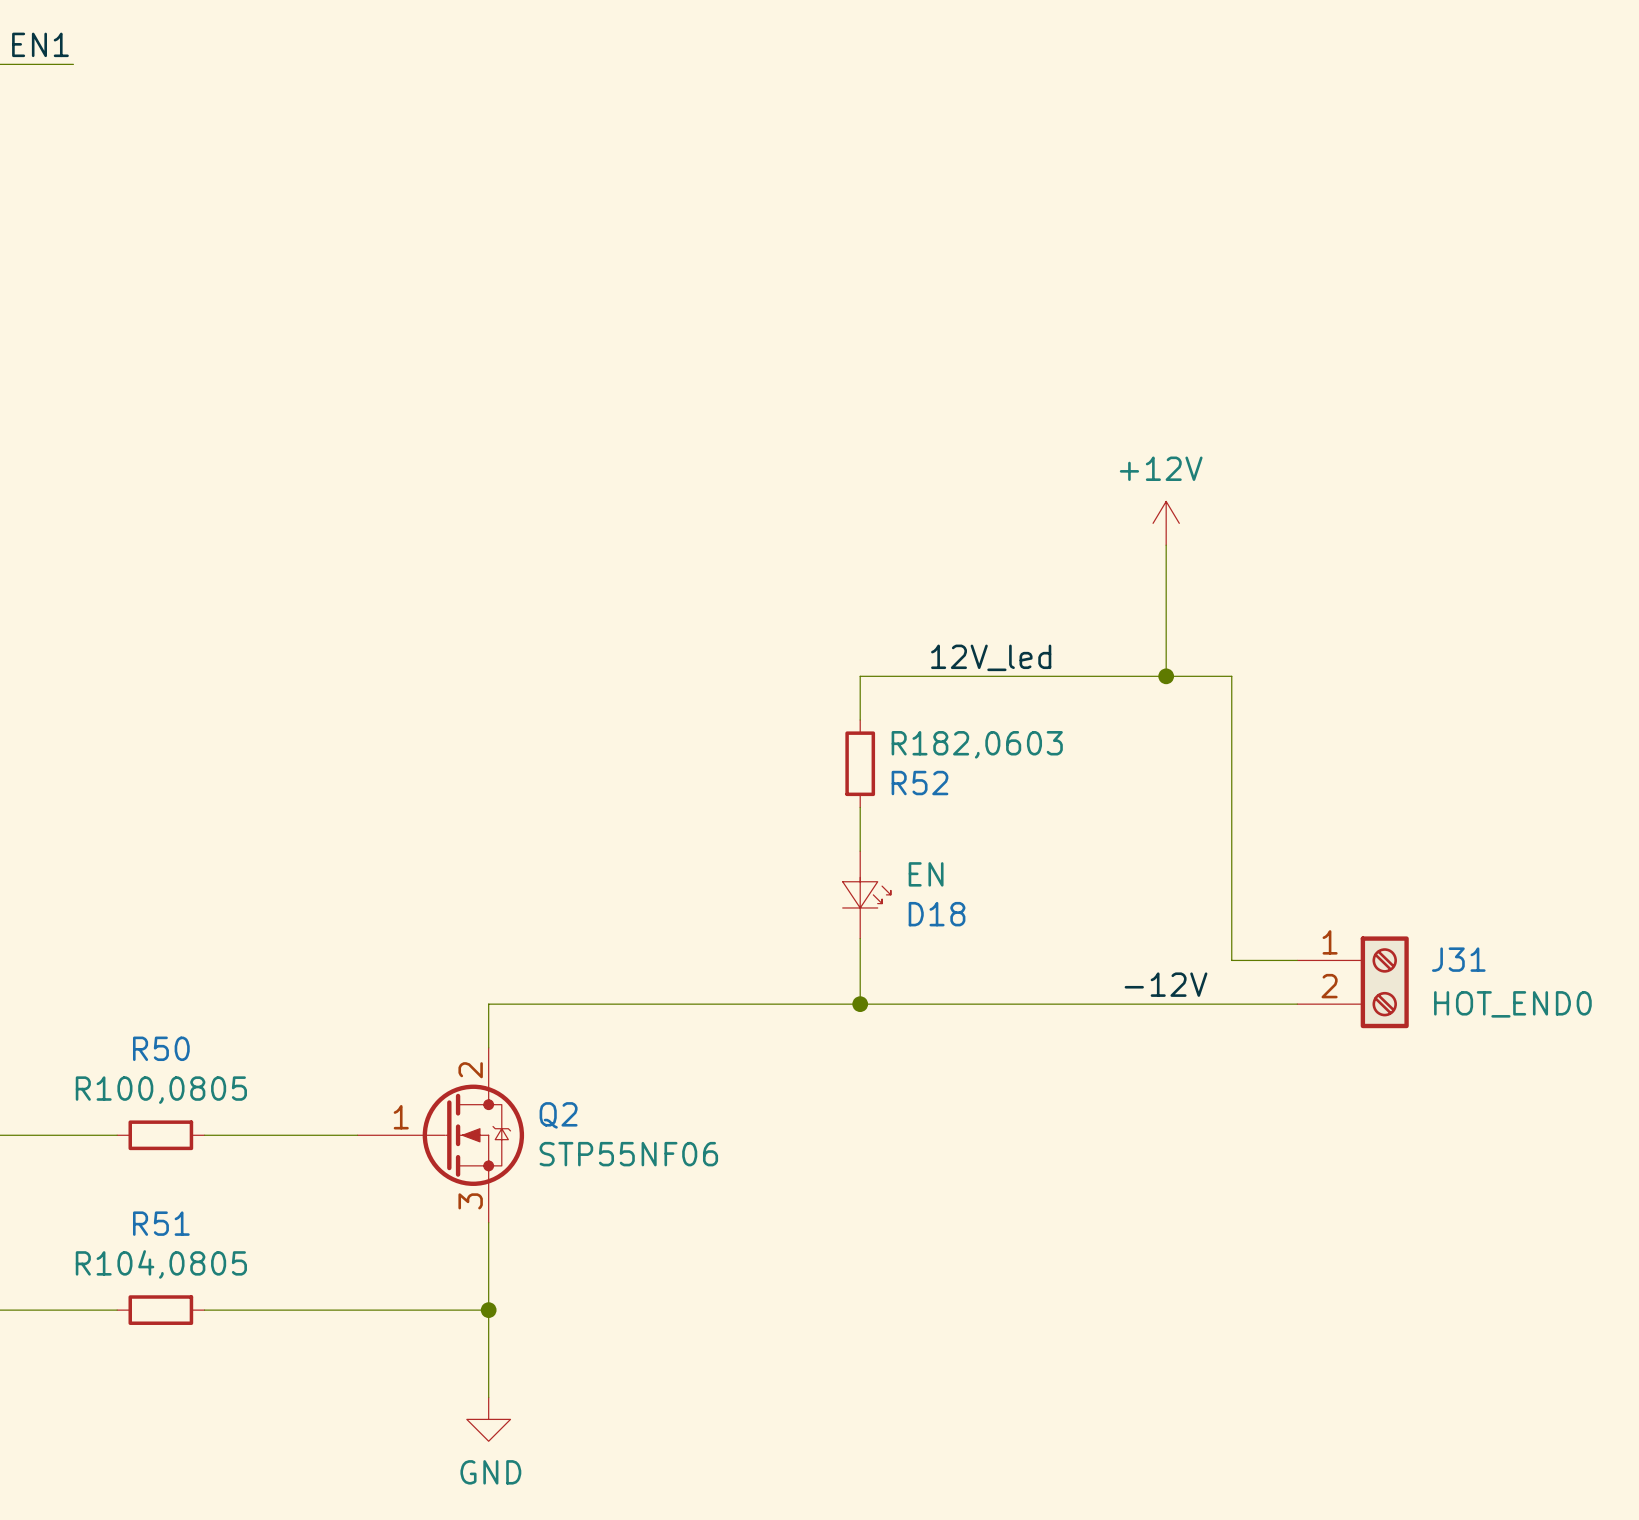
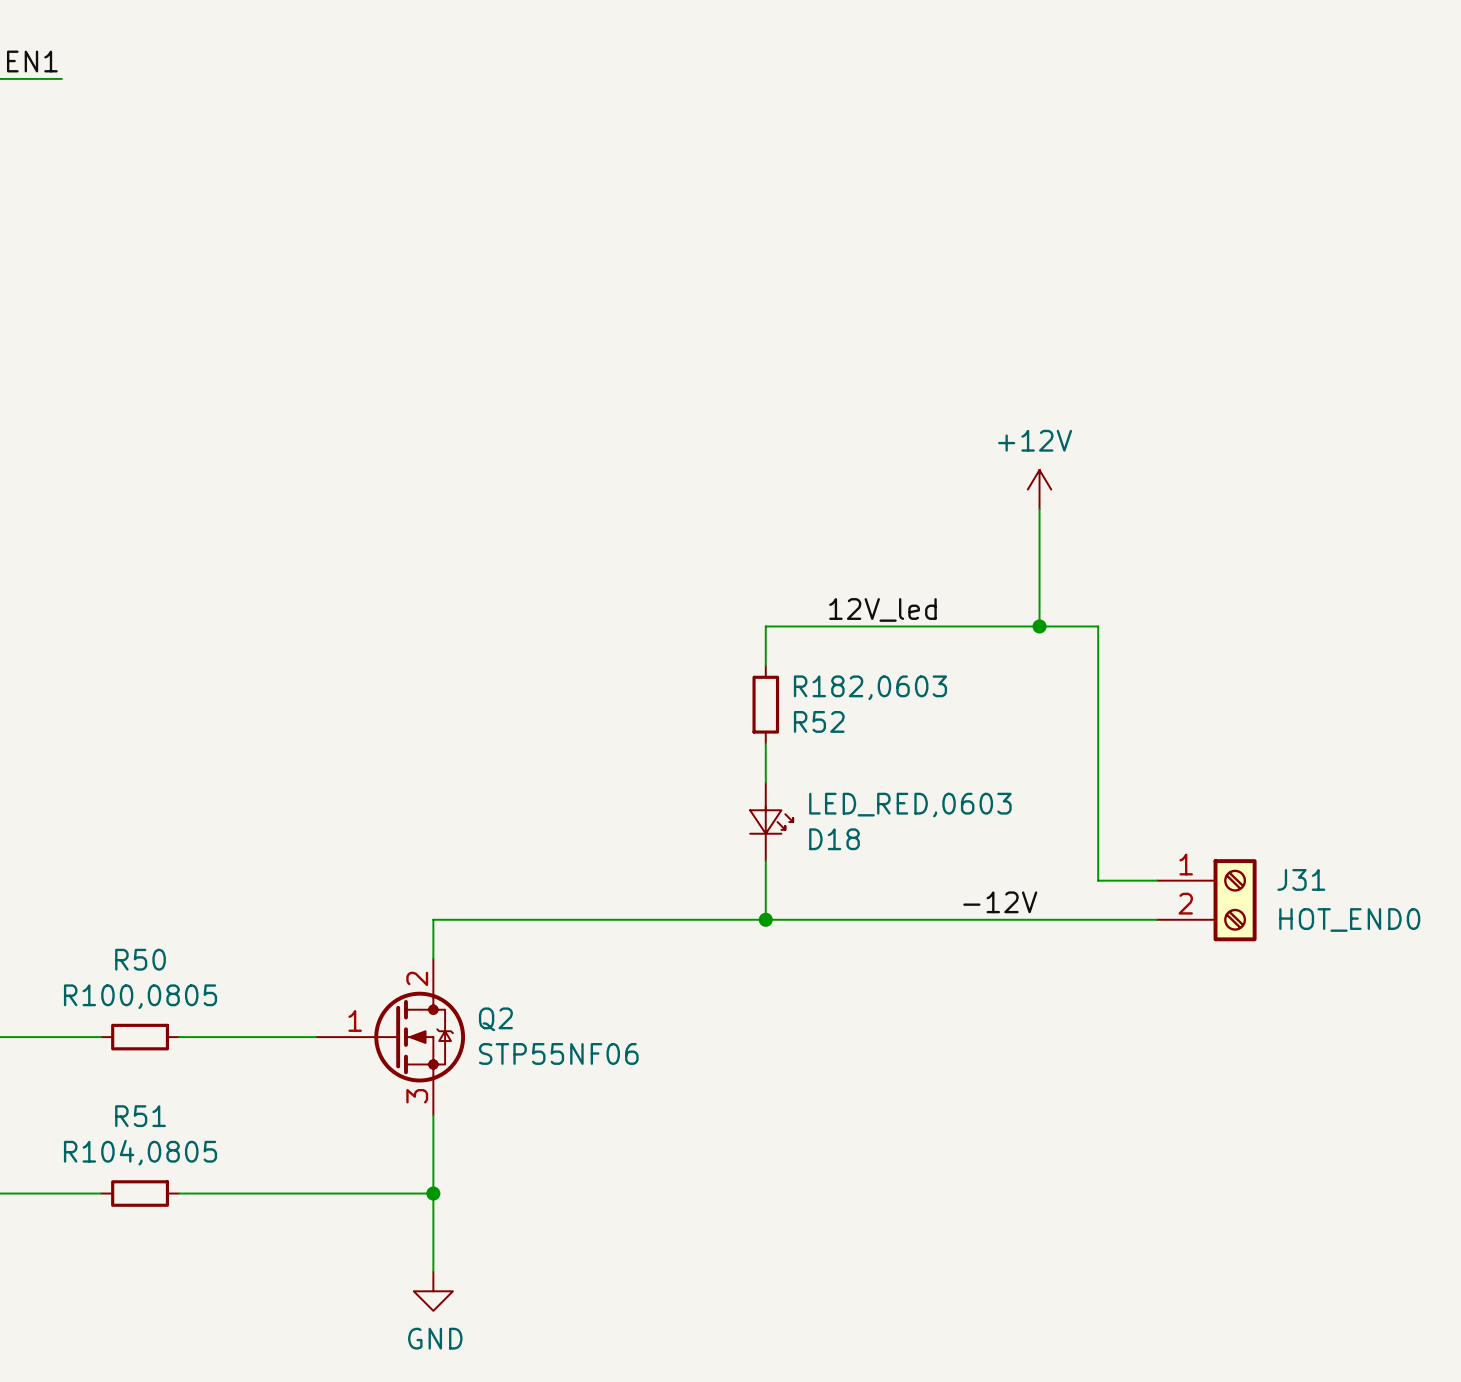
D18 value: EN (926, 874) -> LED_RED,0603 (910, 805)
label position: -12V (1166, 984) -> -12V (1000, 902)

